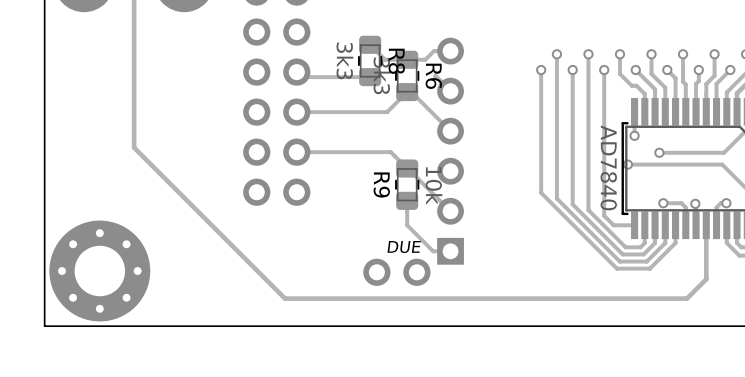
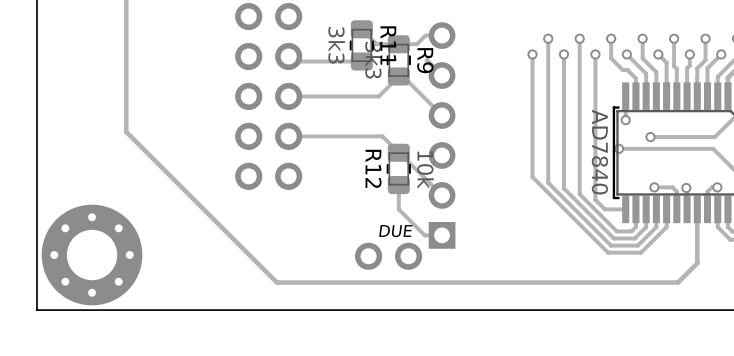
R8 name: R8 (396, 61) -> R11 (388, 45)
R6 name: R6 (433, 76) -> R9 (425, 60)
R9 name: R9 (381, 185) -> R12 (373, 168)

